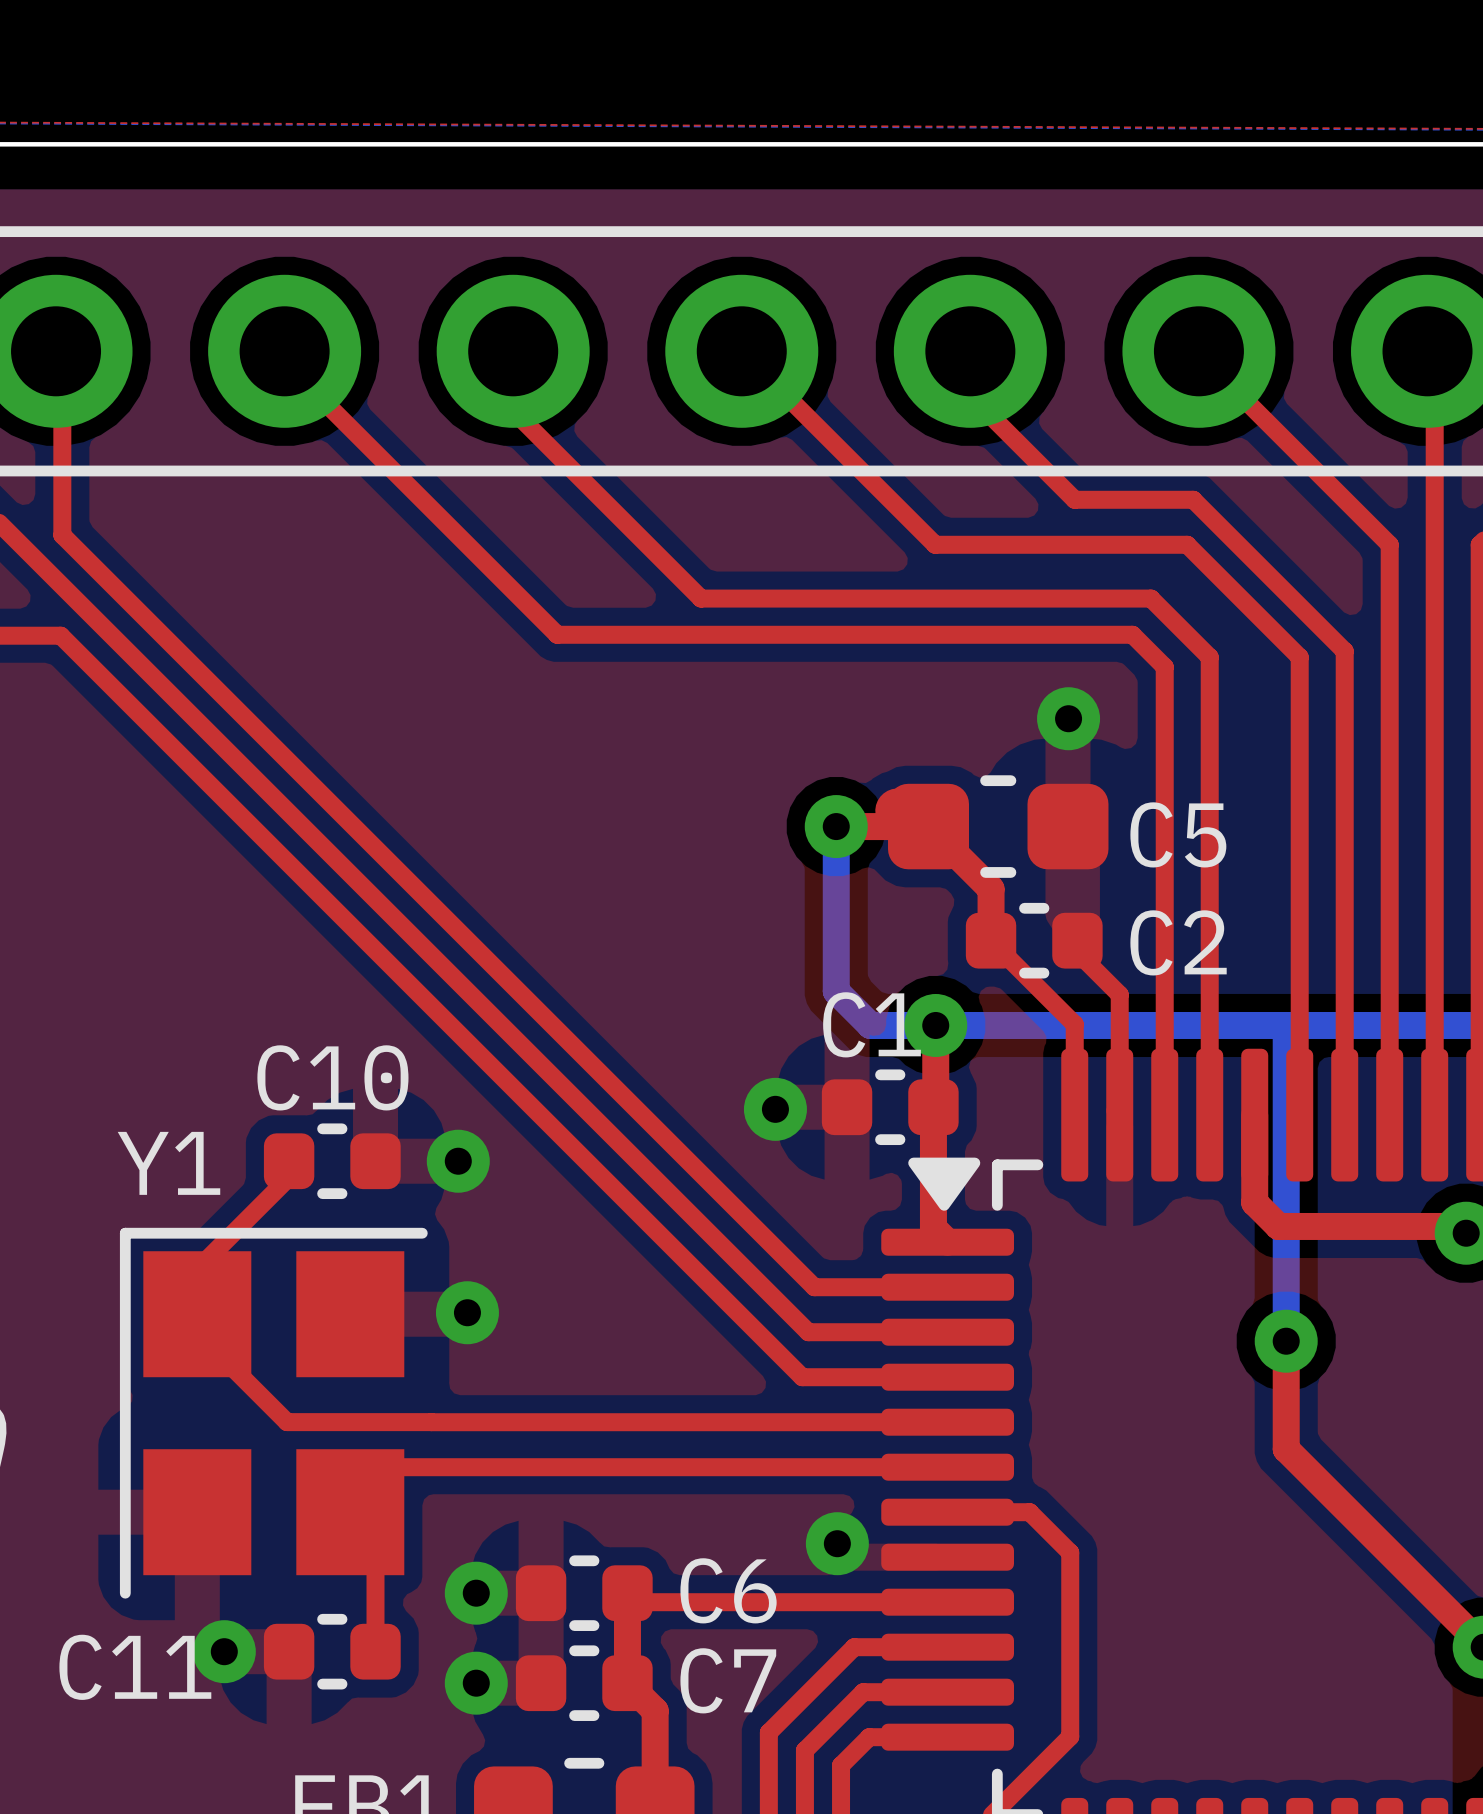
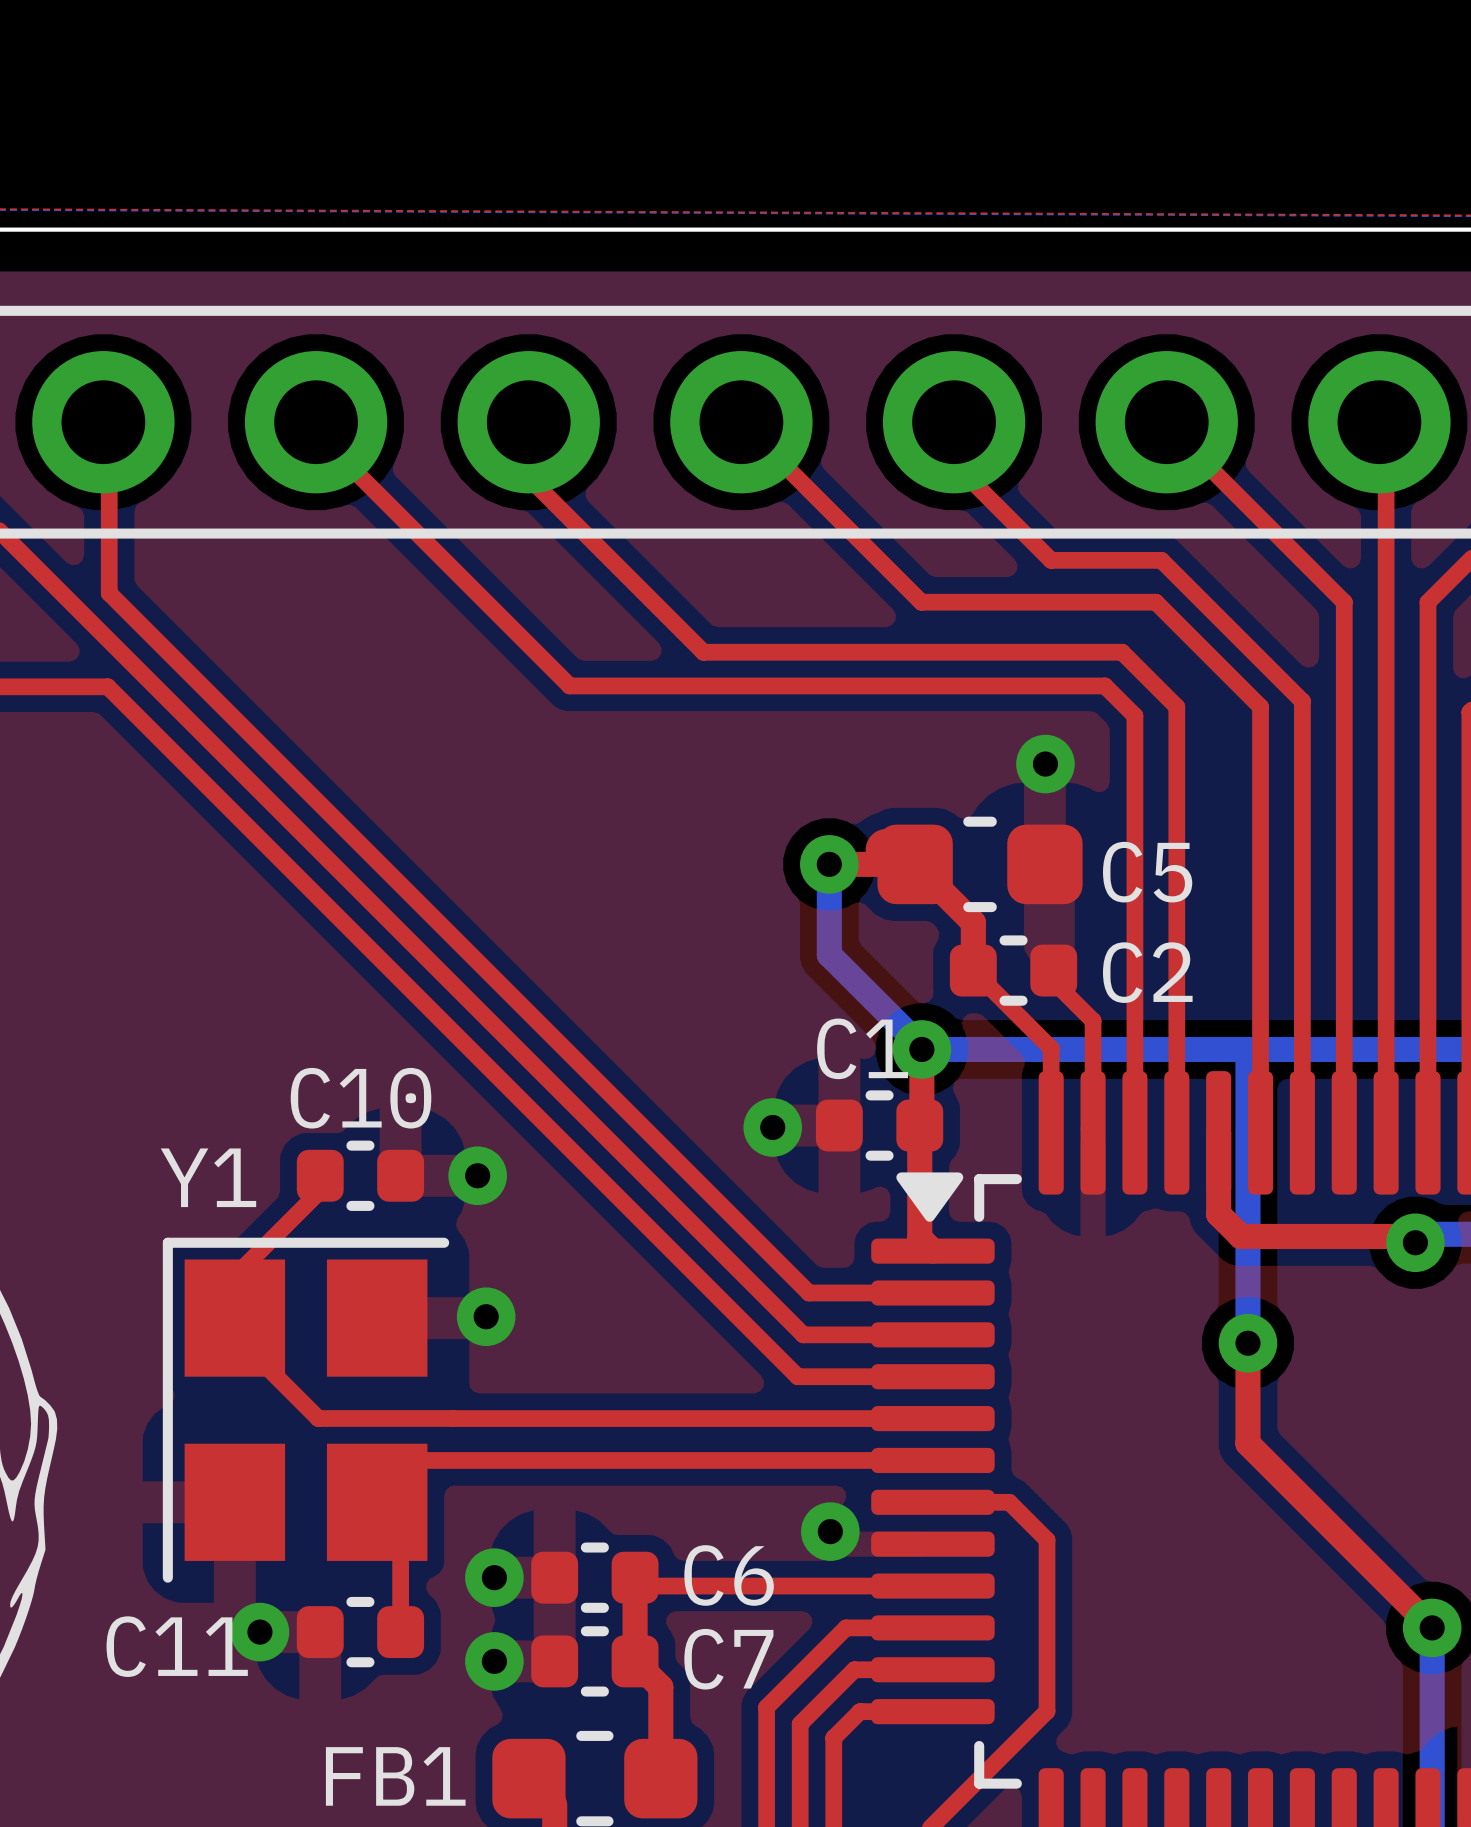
bottom track: (836, 923) (836, 991) (870, 1025) (935, 1025) -> (829, 954) (921, 1049)

